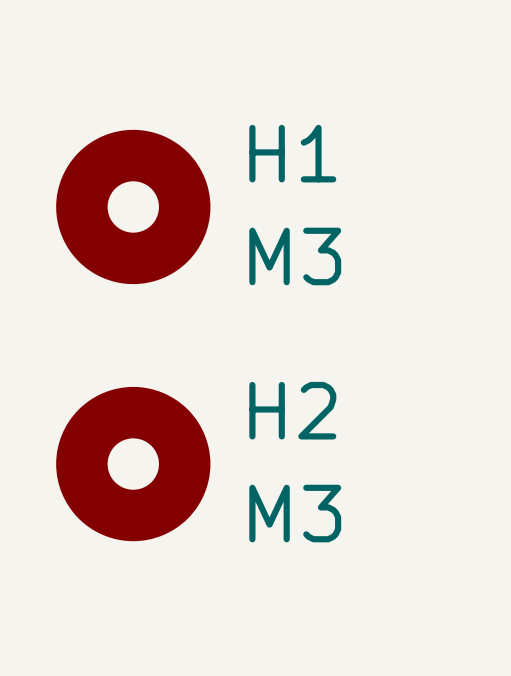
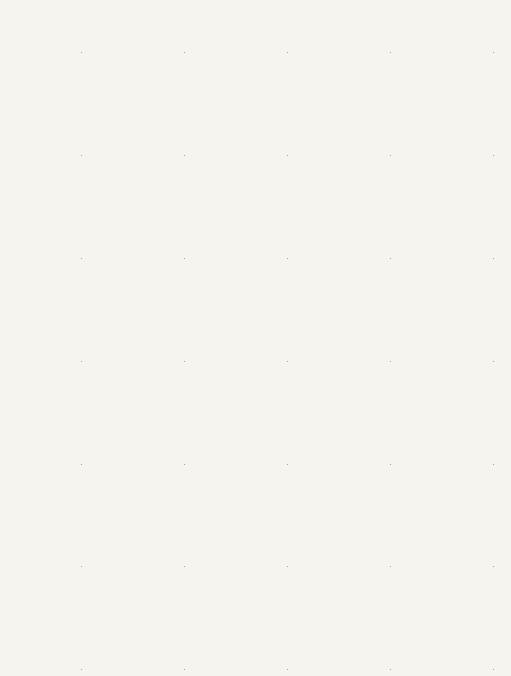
H1: M3 (133, 206) -> none
H2: M3 (133, 464) -> none

